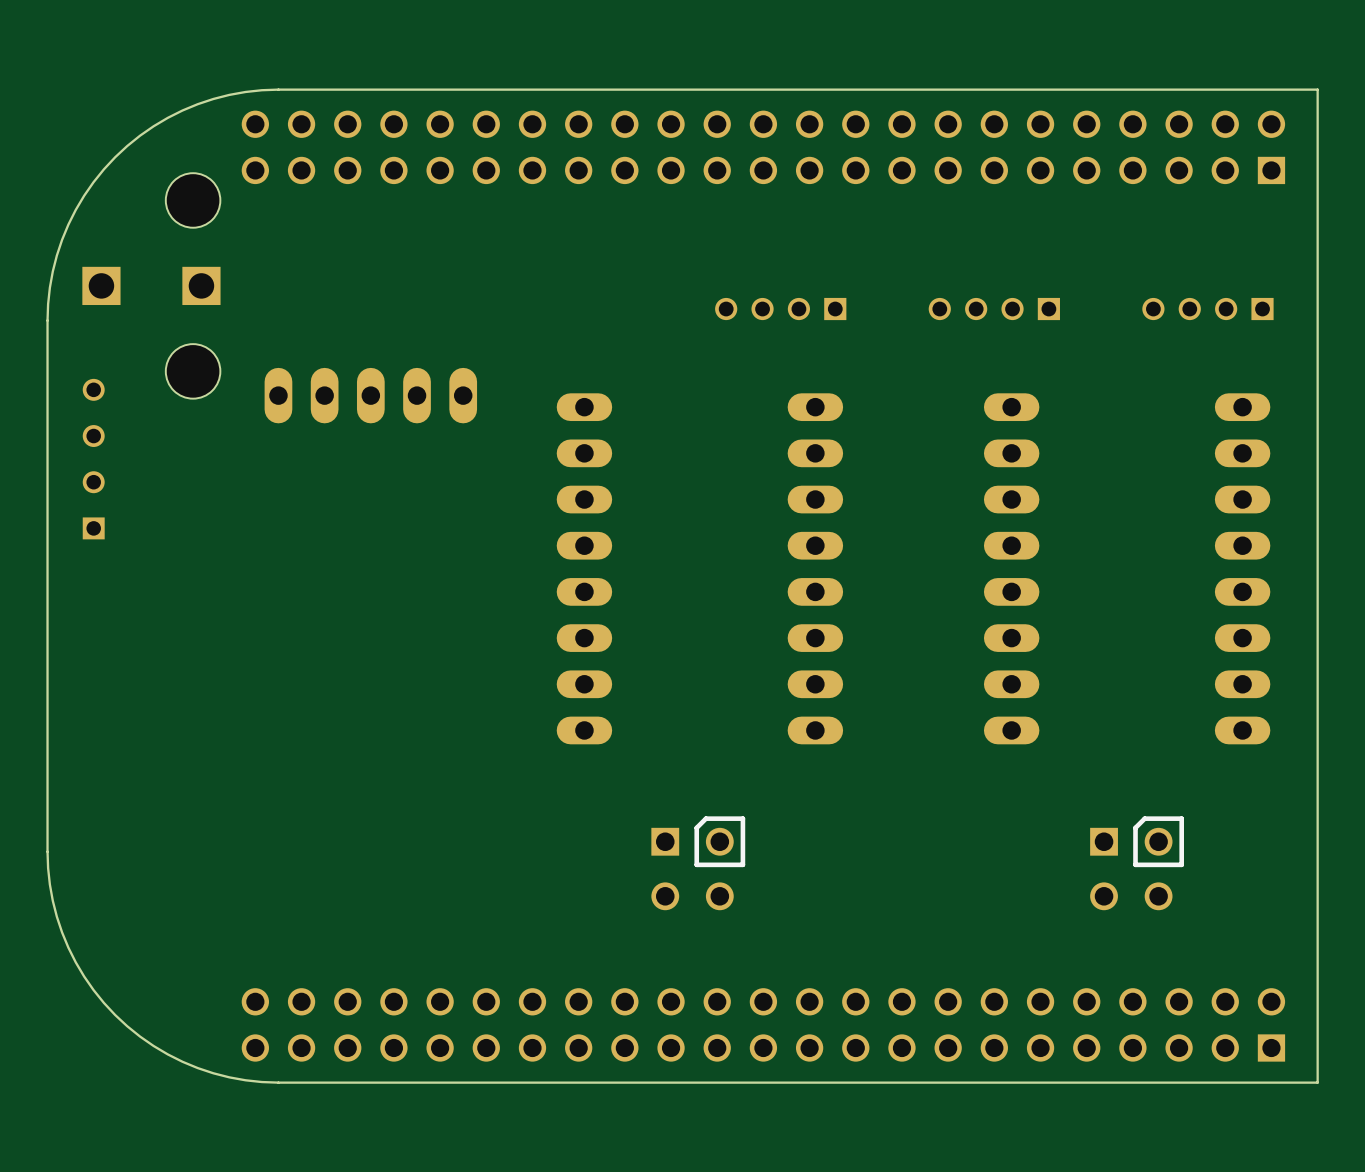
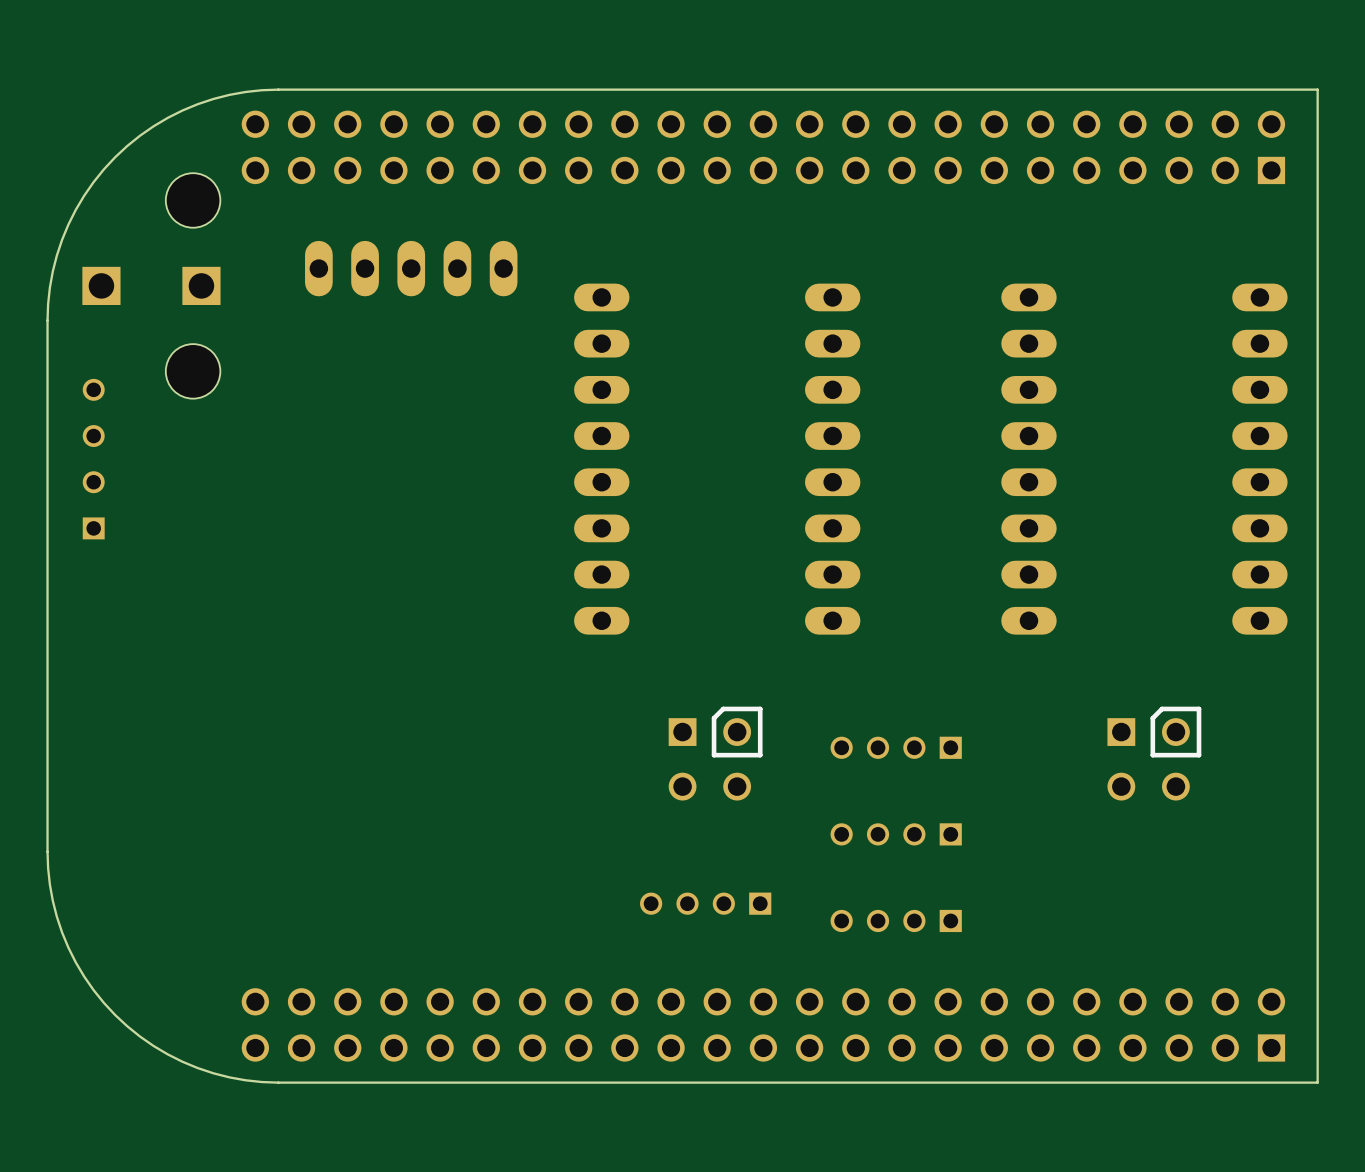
part: (780, 309) -> none
part: (994, 309) -> none
part: (1207, 309) -> none
part position: (370, 395) -> (411, 268)
part: none -> (832, 459)
part: none -> (1028, 459)
part position: (584, 568) -> (601, 459)
part: (815, 568) -> none
part: (1011, 568) -> none
part position: (1242, 568) -> (1259, 459)
part: none -> (896, 747)
part: none -> (896, 834)
part position: (698, 863) -> (715, 753)
part position: (1137, 863) -> (1154, 753)
part: none -> (705, 903)
part: none -> (896, 920)

